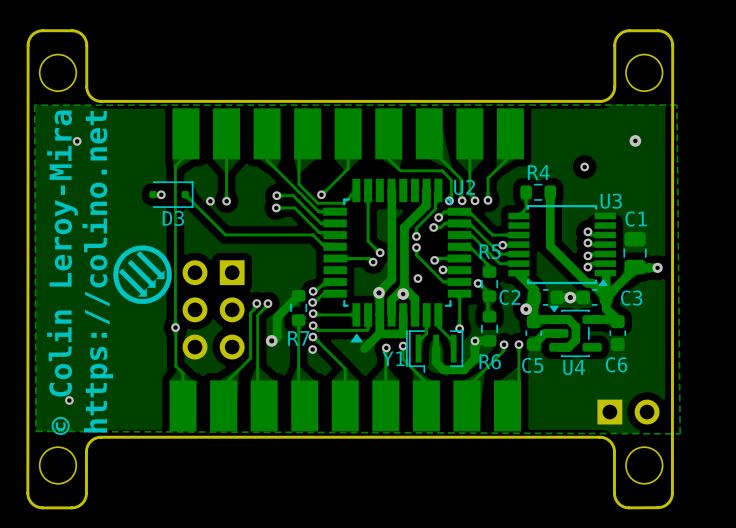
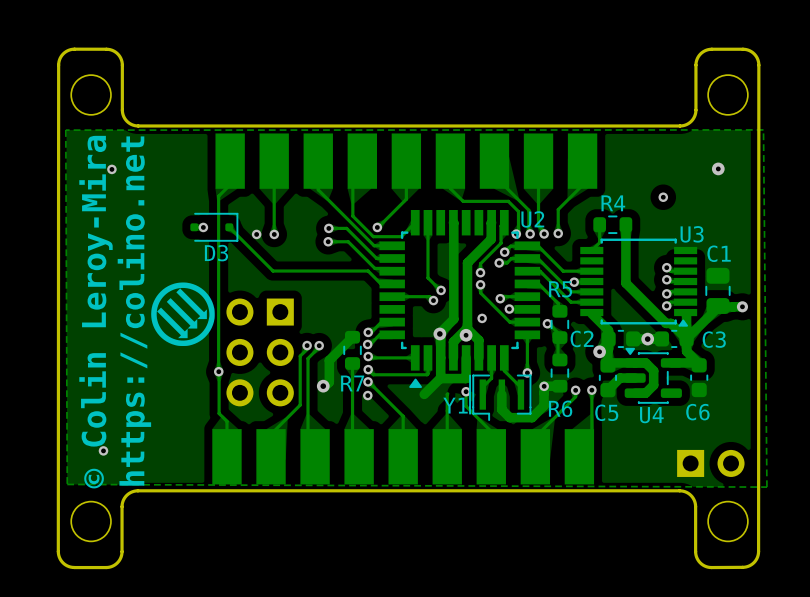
via: (386, 347) -> none

